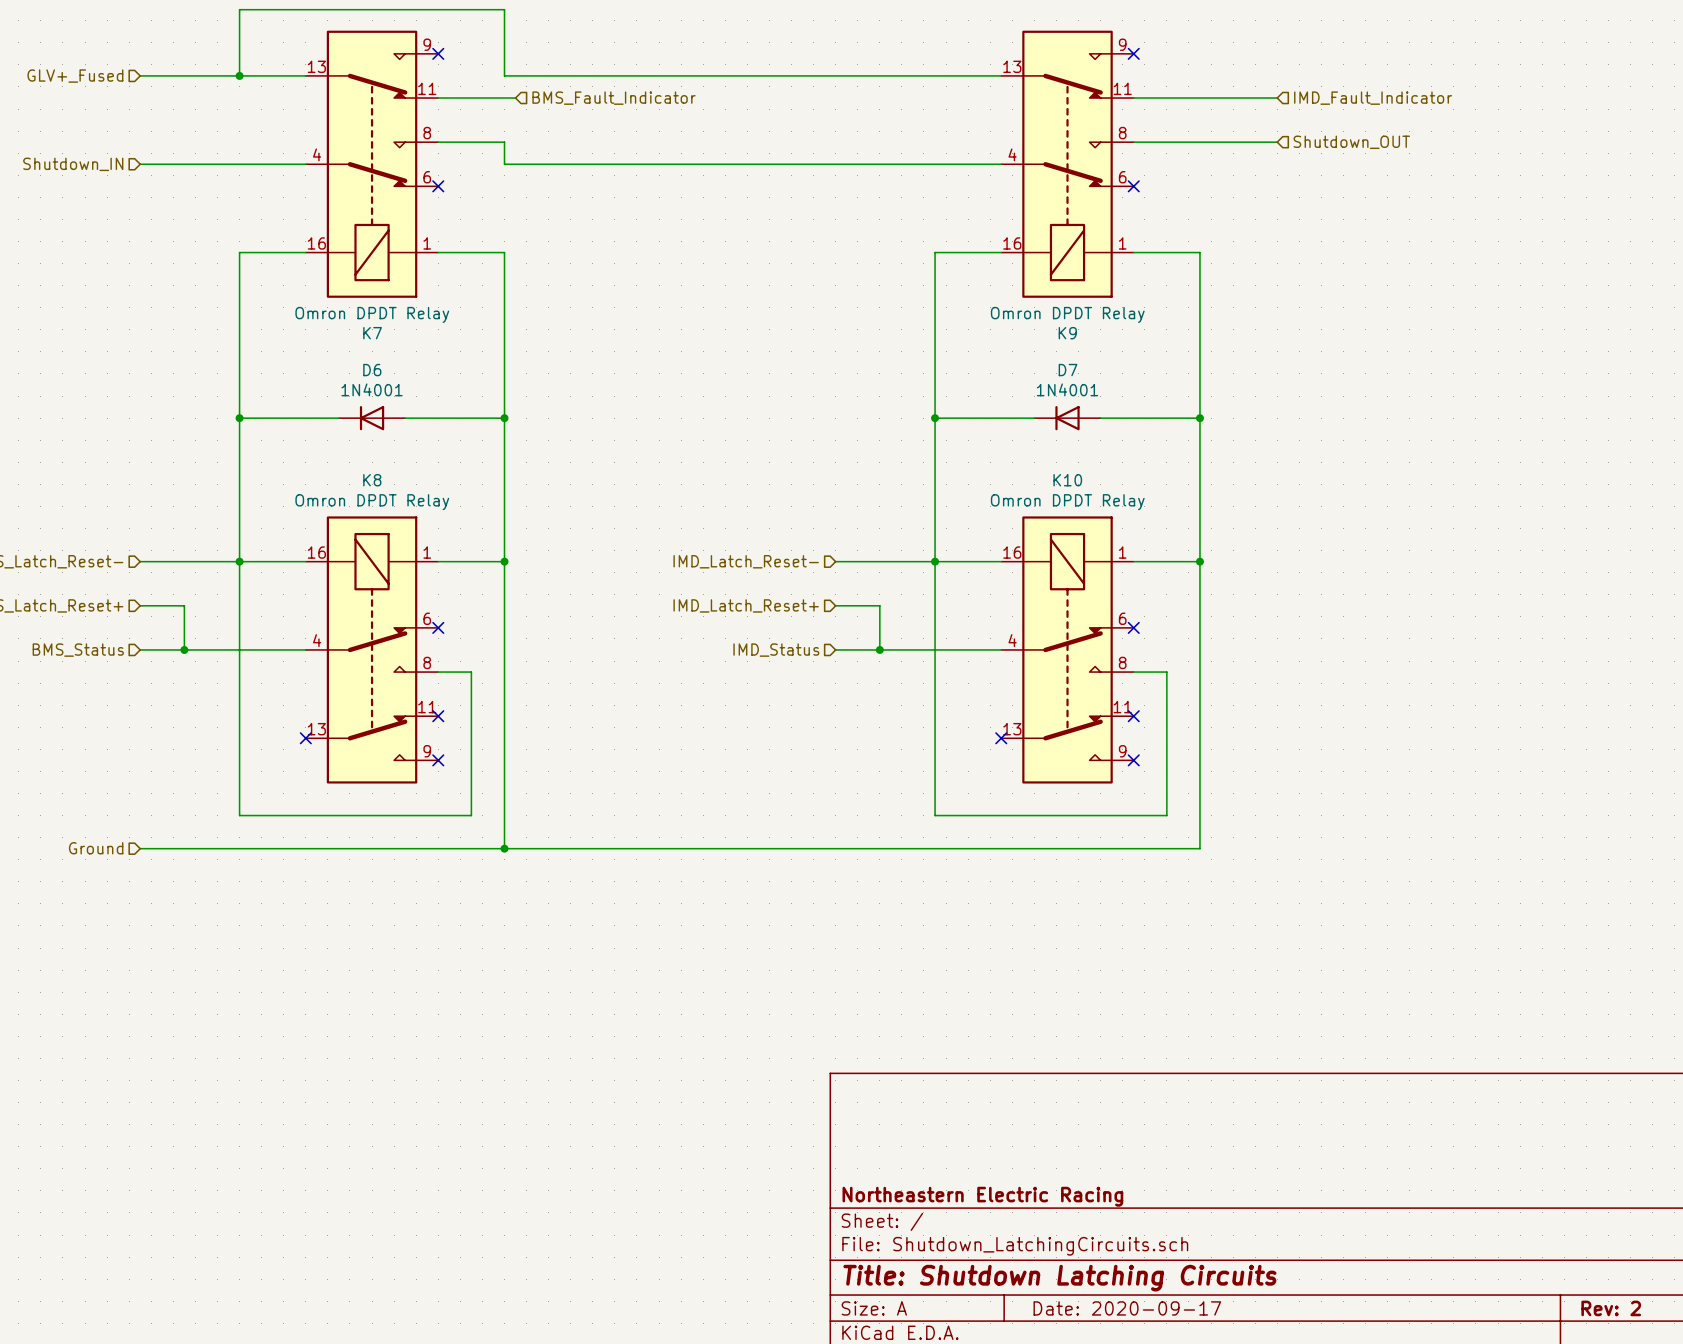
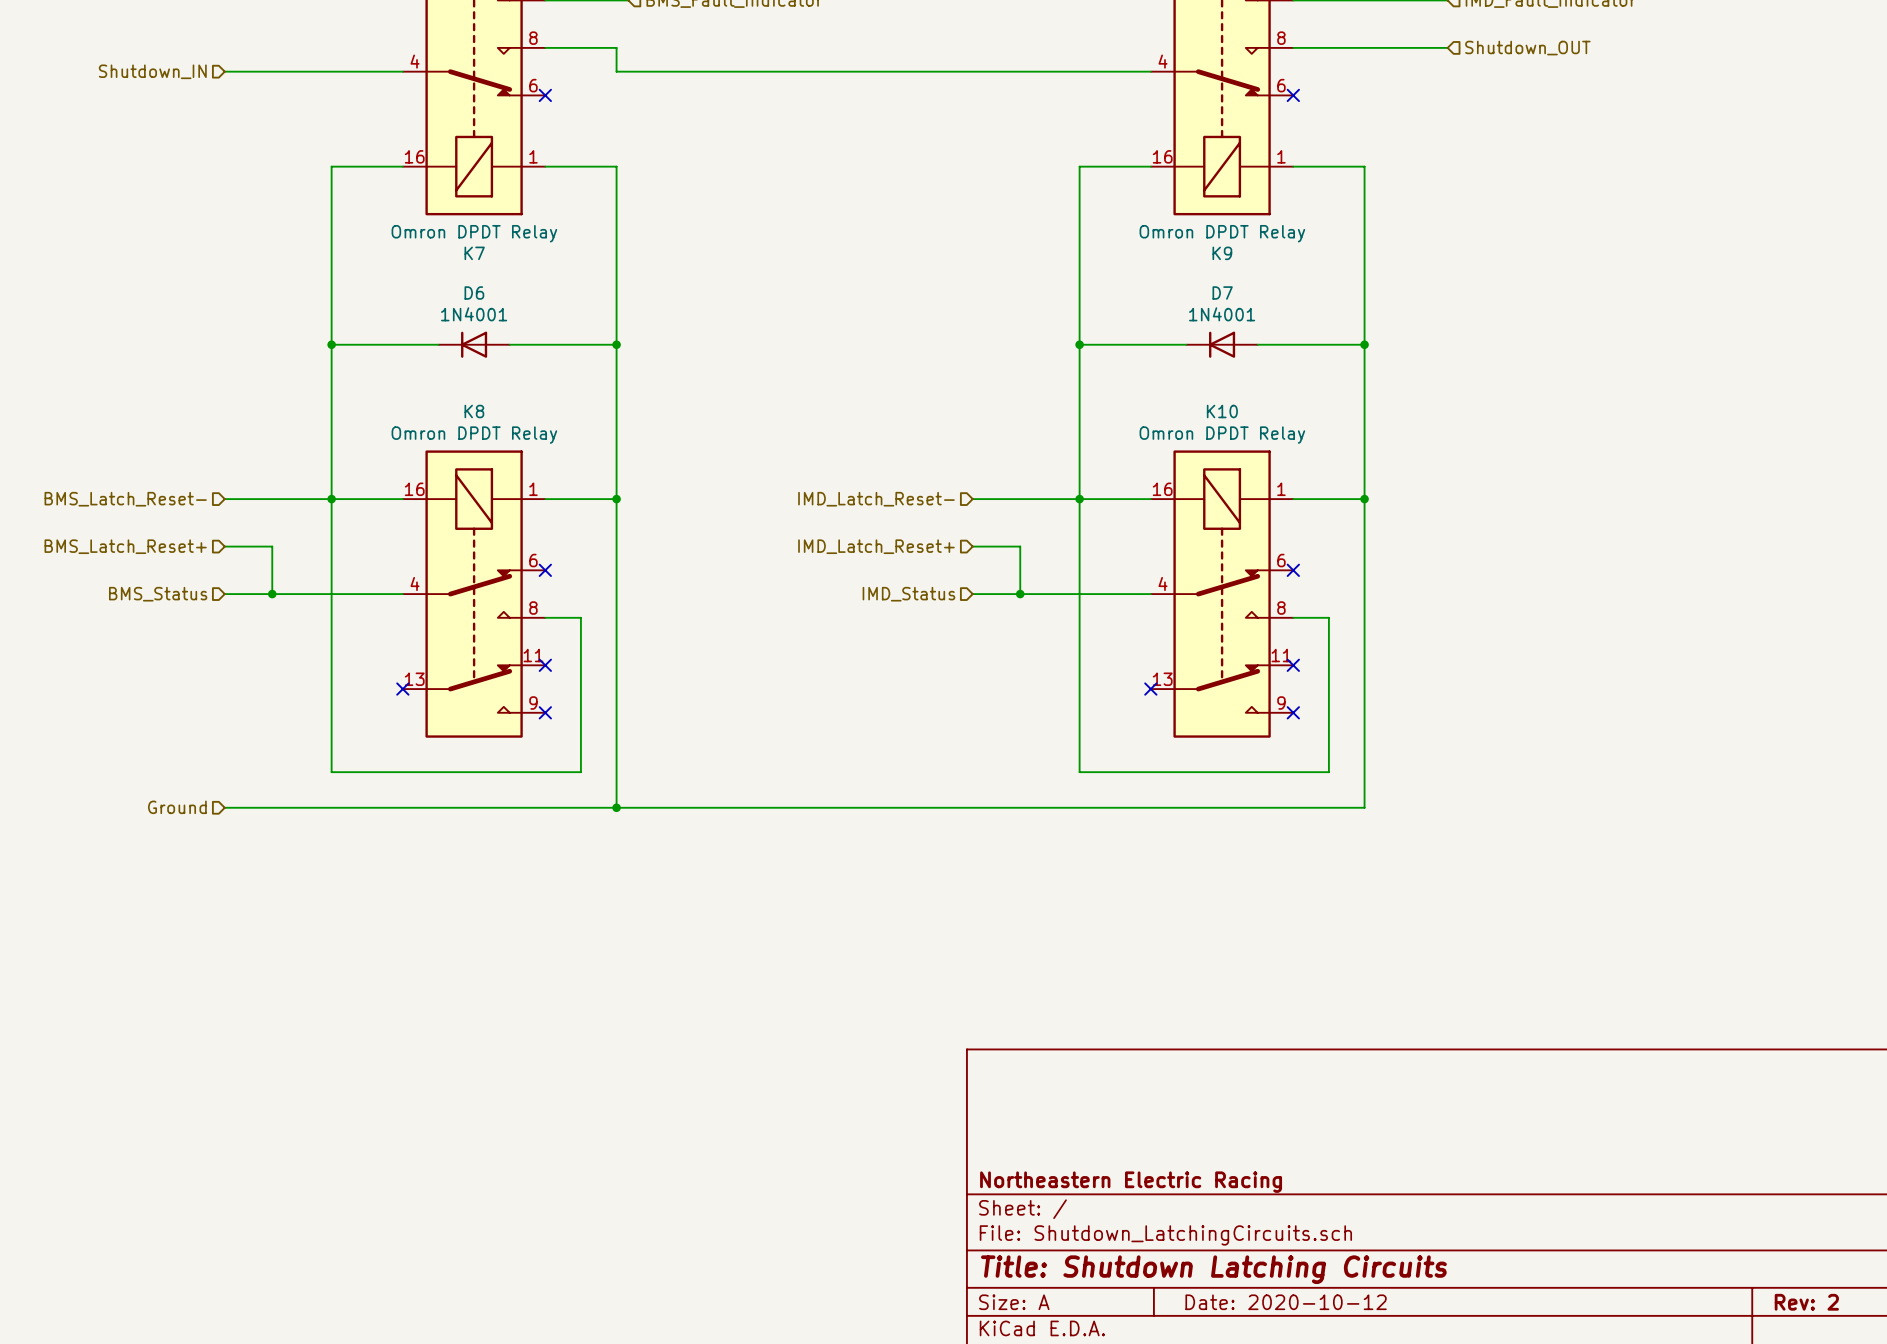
title block: Date: 2020-09-17 (1127, 1308) -> Date: 2020-10-12 (1286, 1302)

